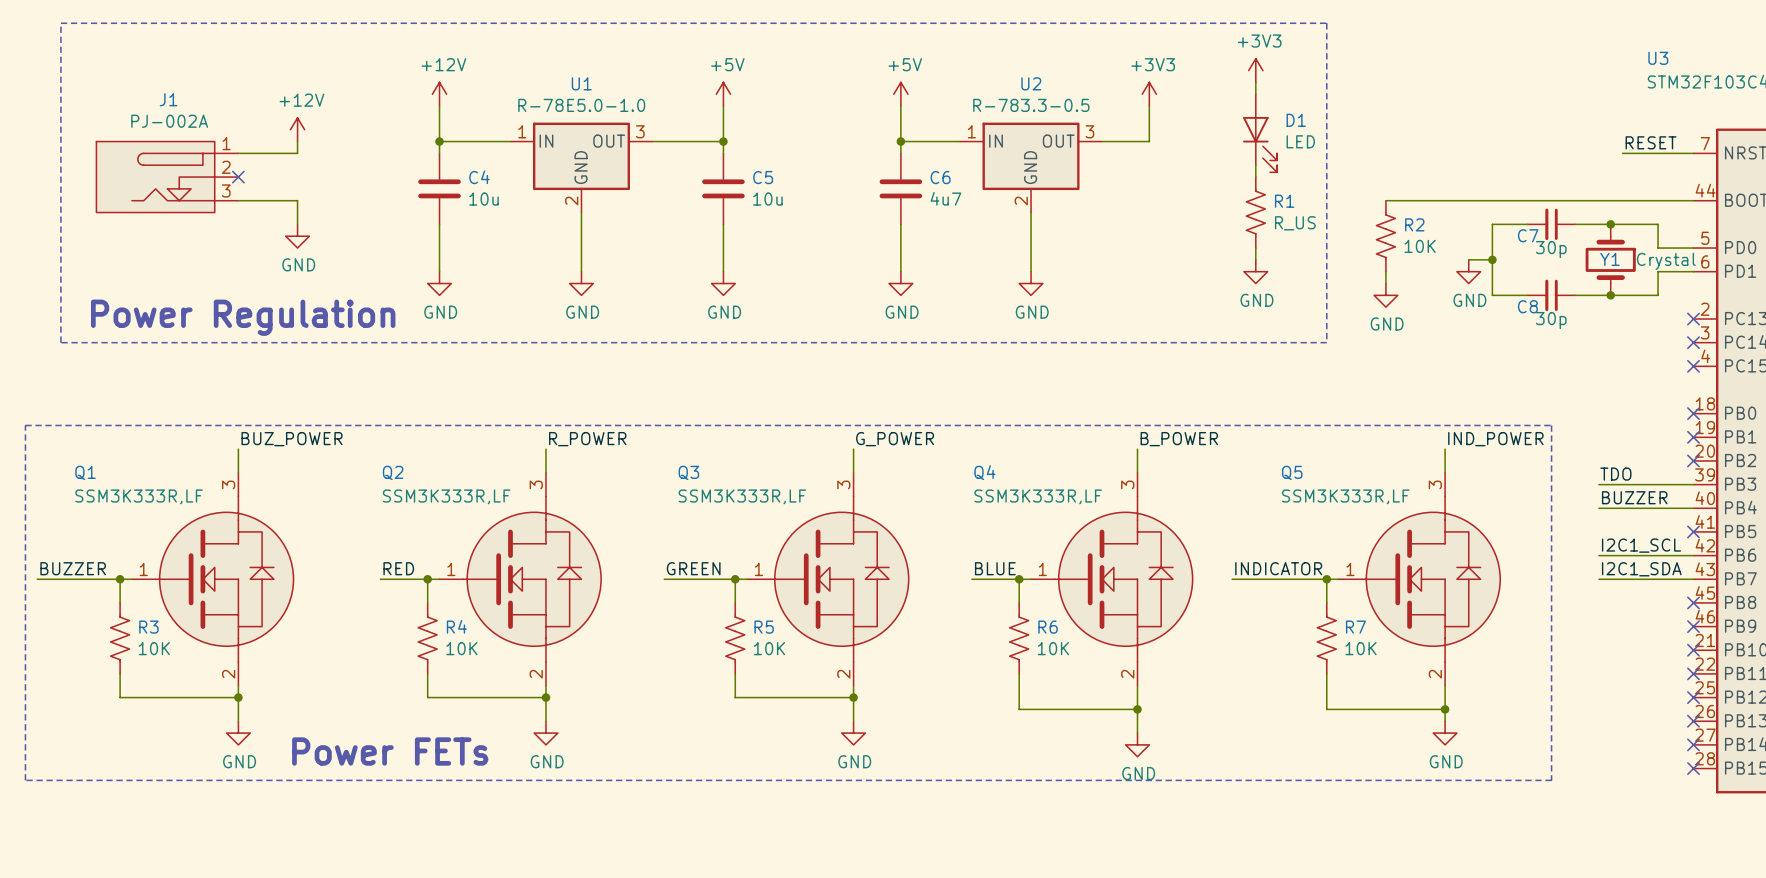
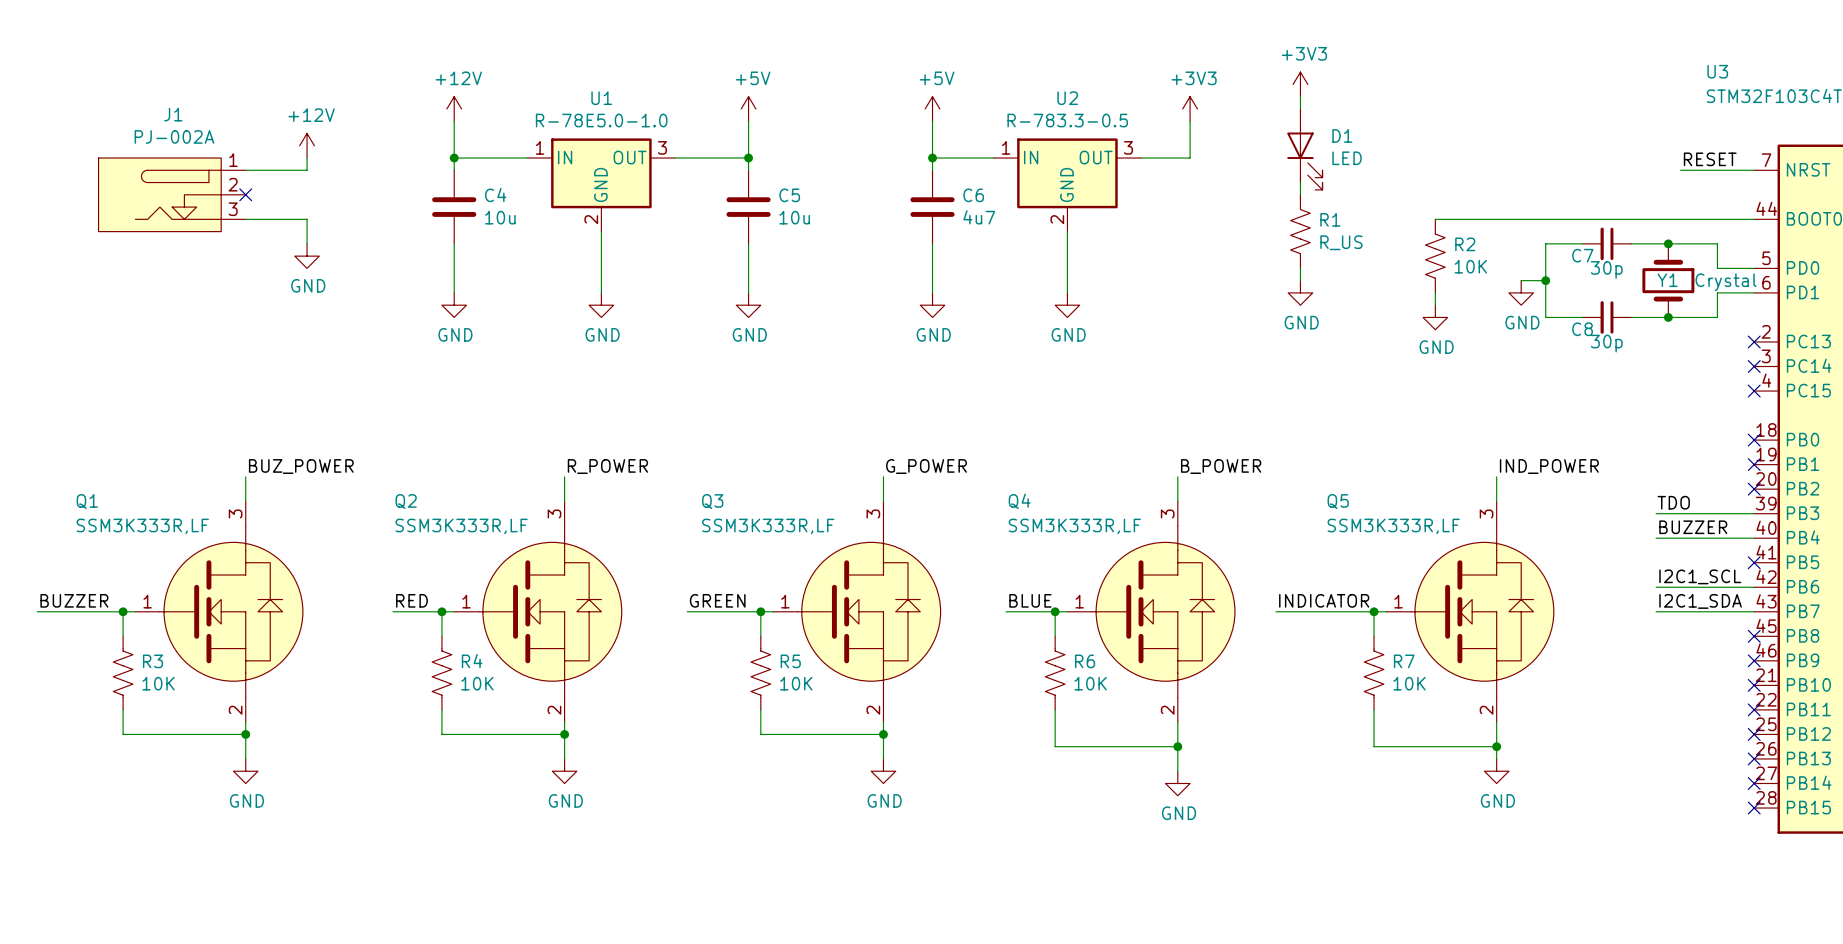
line: (60, 23) (60, 342) (1326, 342) (1326, 23) (60, 23) -> none
text: Power Regulation (243, 317) -> none
line: (25, 425) (1551, 425) (1551, 780) (25, 780) (25, 425) -> none
text: Power FETs (390, 751) -> none

